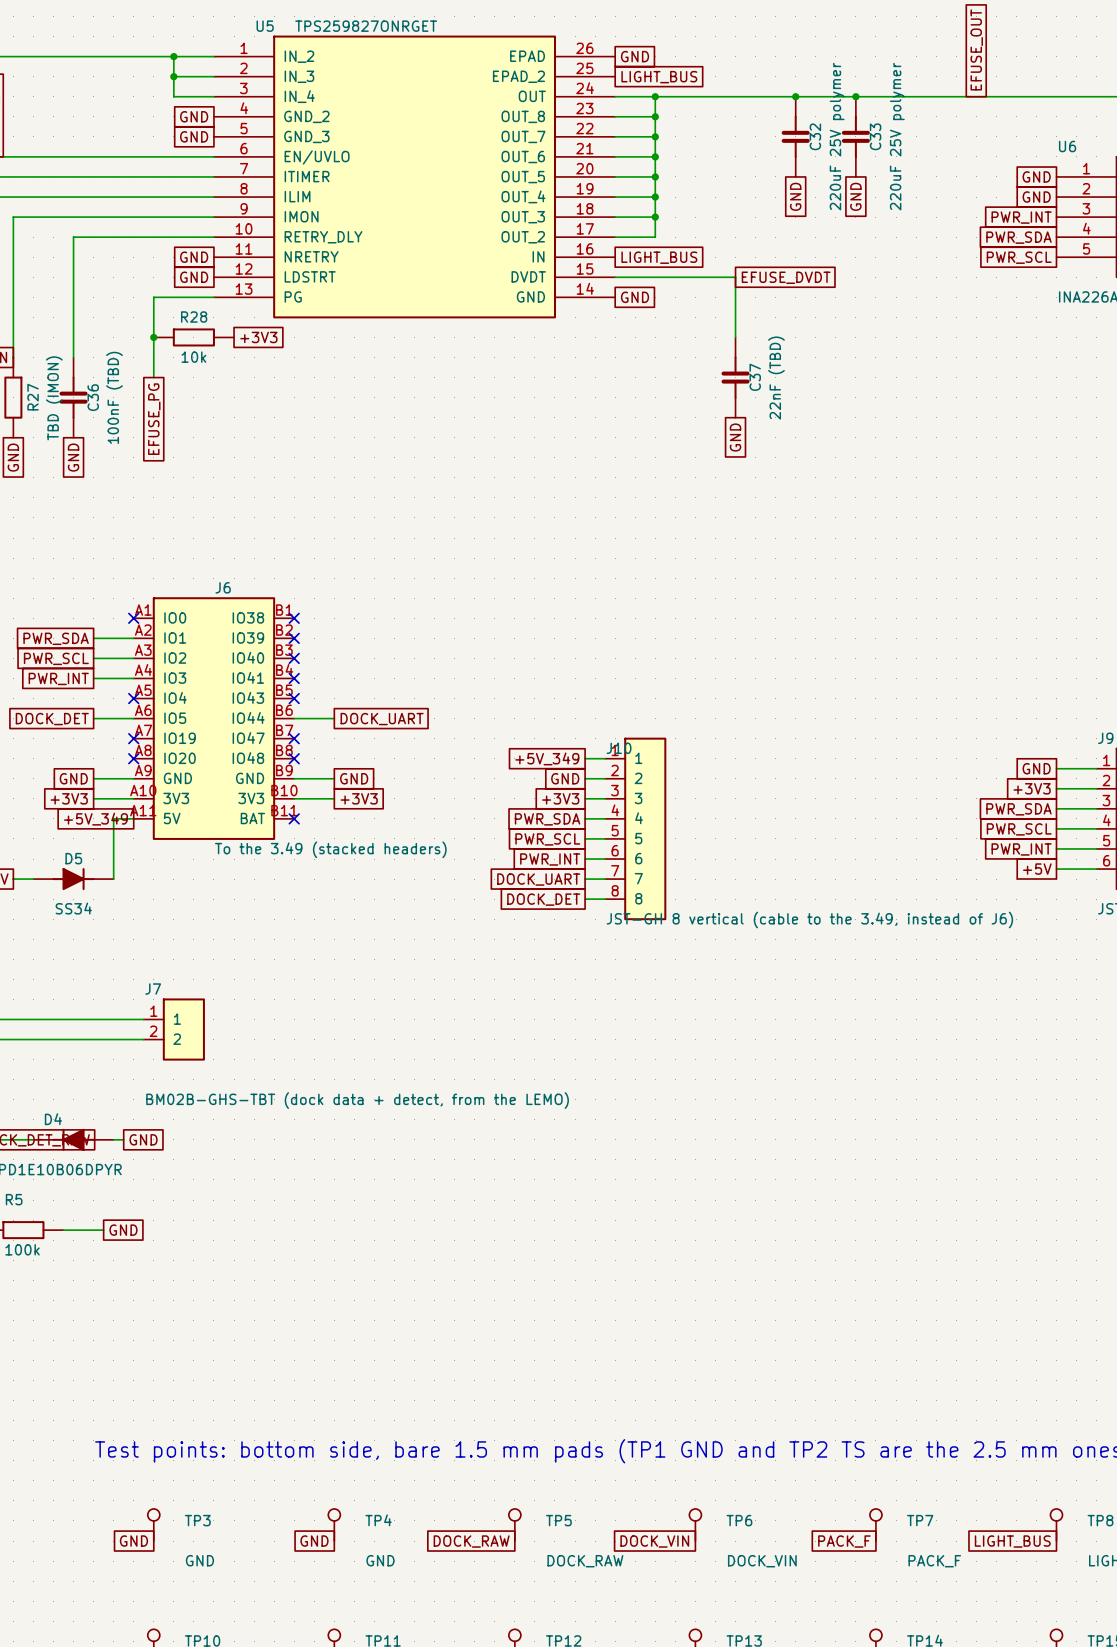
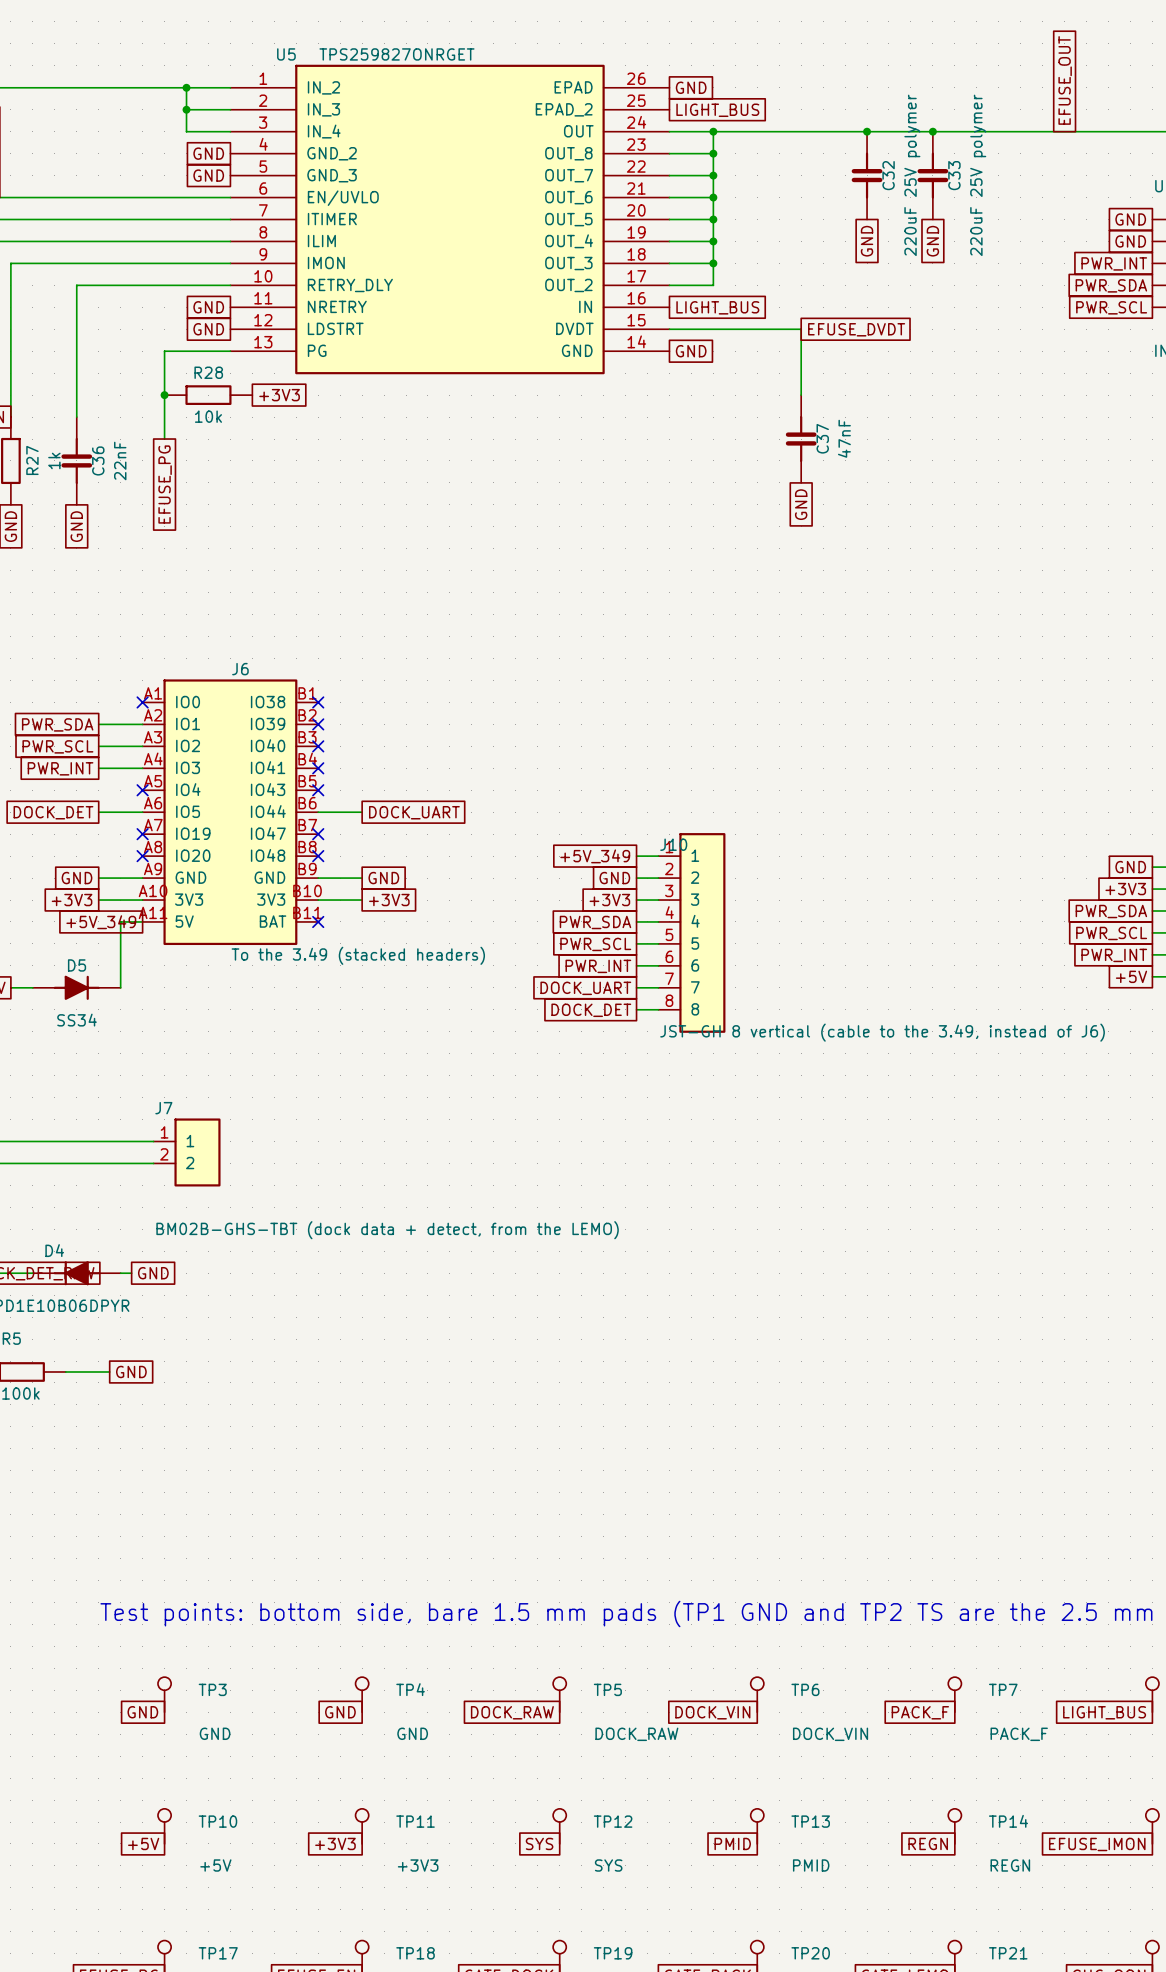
C37 value: 22nF (TBD) (776, 378) -> 47nF (844, 438)
C36 value: 100nF (TBD) (114, 397) -> 22nF (120, 460)
R27 value: TBD (IMON) (54, 398) -> 1k (54, 460)

